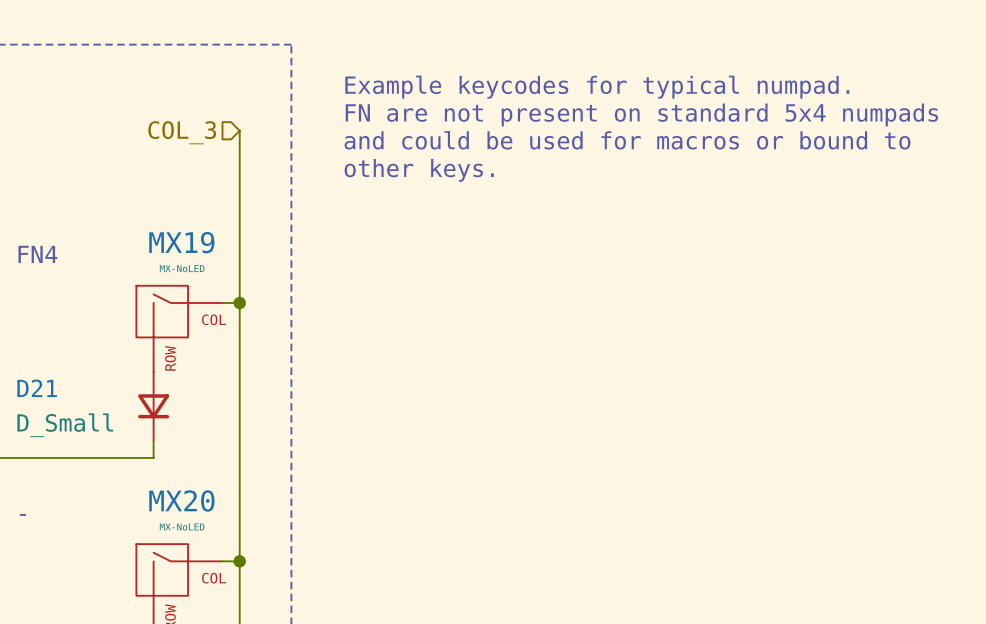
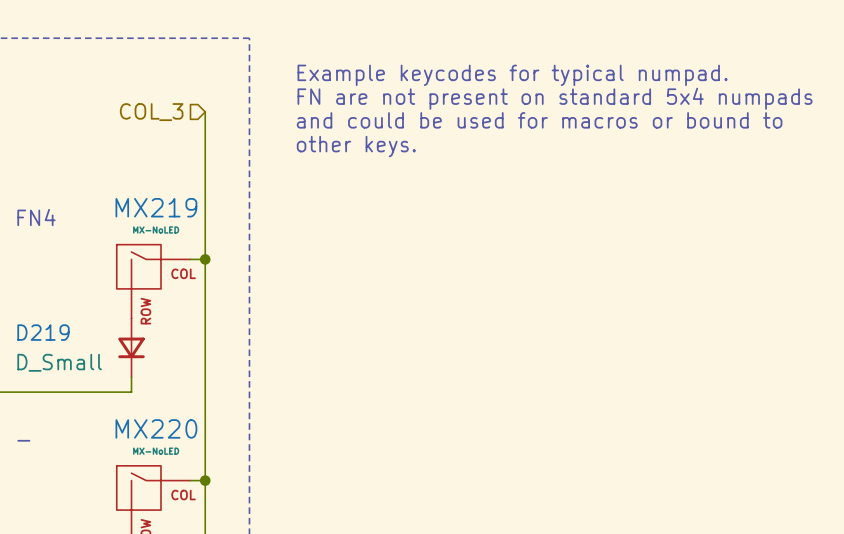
MX19 name: MX19 (181, 242) -> MX219 (156, 207)
D21 name: D21 (37, 388) -> D219 (43, 332)
MX20 name: MX20 (181, 500) -> MX220 (156, 428)

